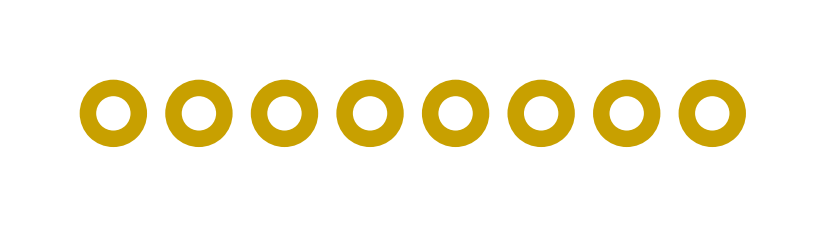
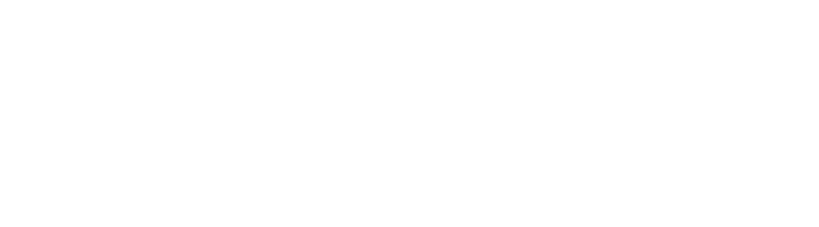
part: (412, 113) -> none

